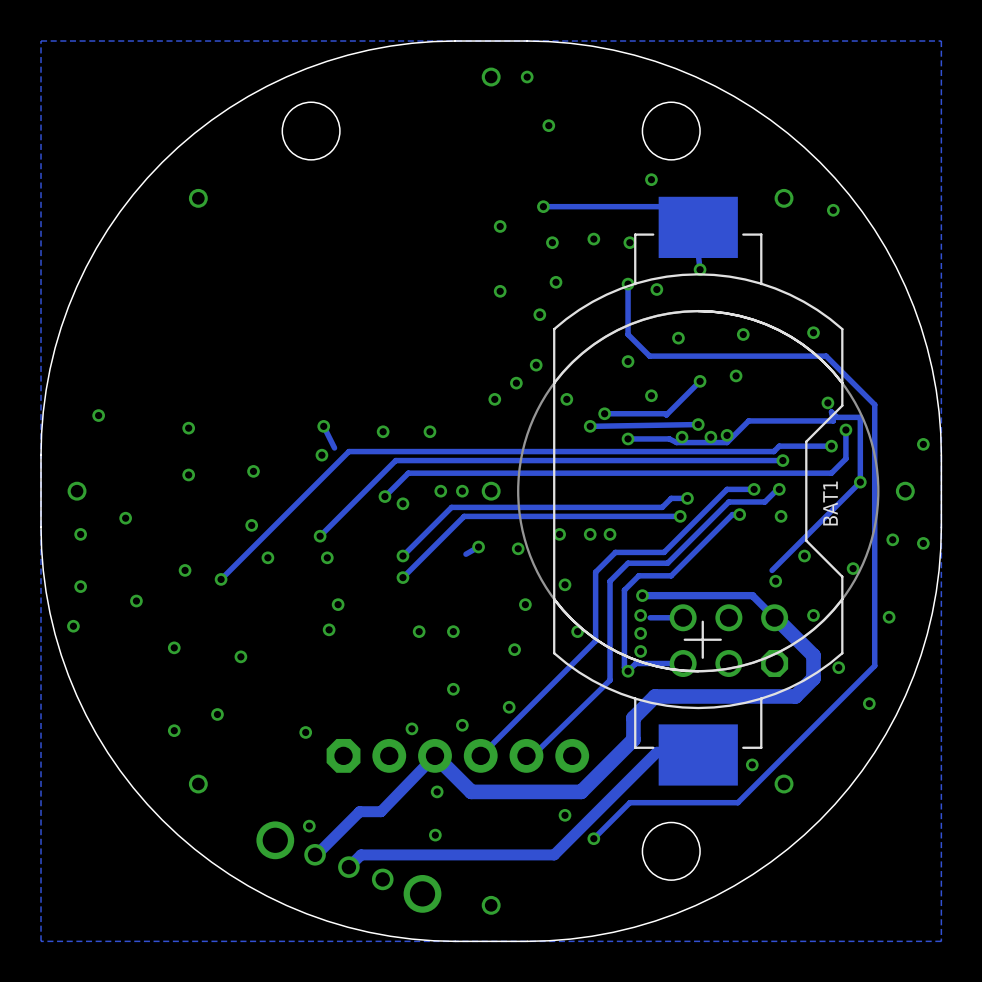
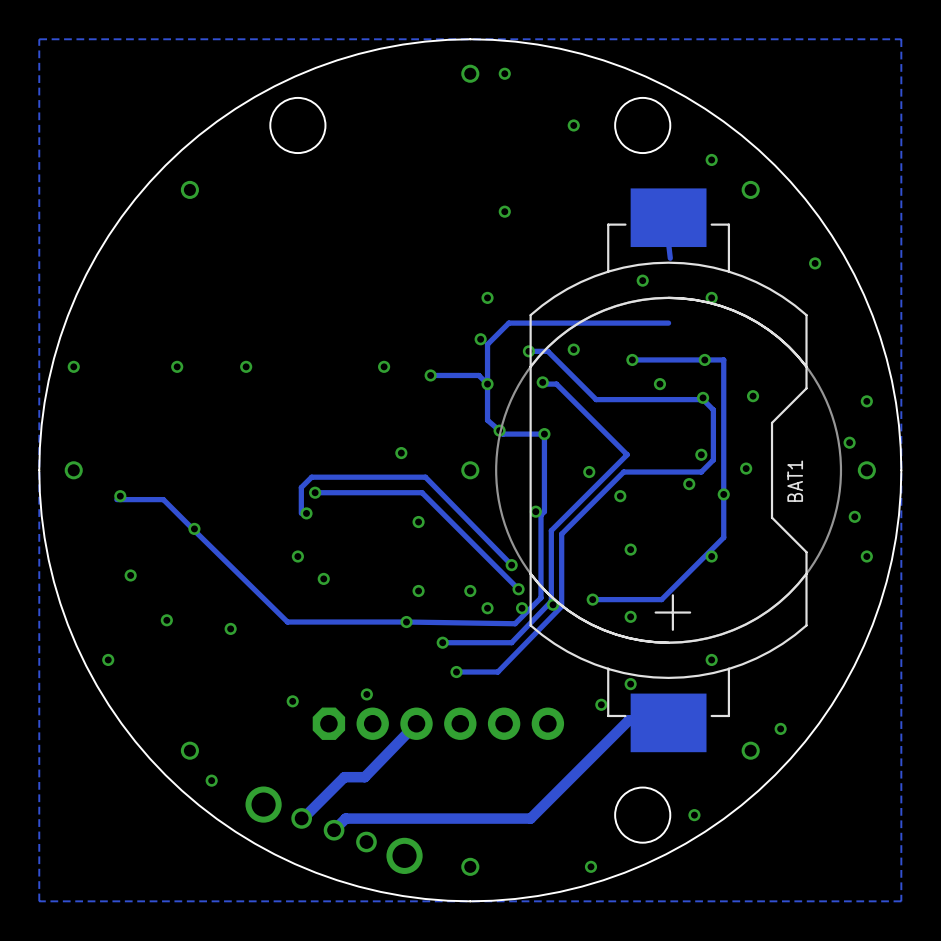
board edge: (527, 41) (411, 43) (347, 55) (306, 68) (267, 86) (211, 120) (178, 147) (147, 178) (120, 211) (96, 248) (76, 286) (61, 327) (46, 390) (41, 455) (41, 548) (46, 591) (55, 634) (68, 675) (86, 715) (107, 752) (133, 787) (162, 820) (194, 849) (229, 874) (267, 896) (306, 913) (347, 927) (390, 936) (455, 941) (548, 940) (591, 936) (634, 927) (675, 913) (715, 896) (752, 874) (787, 849) (820, 820) (849, 787) (874, 752) (896, 715) (913, 675) (927, 634) (936, 591) (940, 548) (941, 455) (939, 411) (932, 369) (921, 327) (905, 286) (885, 248) (862, 211) (820, 162) (787, 133) (752, 107) (715, 86) (655, 61) (613, 50) (570, 43) (527, 41) -> (470, 39) (515, 41) (559, 48) (624, 67) (665, 86) (705, 108) (741, 135) (775, 165) (805, 199) (831, 235) (854, 274) (872, 315) (891, 380) (898, 425) (901, 470) (898, 515) (891, 559) (872, 624) (854, 665) (831, 705) (805, 741) (775, 775) (741, 805) (705, 831) (665, 854) (624, 872) (559, 891) (515, 898) (470, 901) (425, 898) (380, 891) (315, 872) (274, 854) (235, 831) (199, 805) (165, 775) (135, 741) (108, 705) (86, 665) (67, 624) (48, 559) (41, 515) (39, 470) (41, 425) (48, 380) (67, 315) (86, 274) (108, 235) (135, 199) (165, 165) (199, 135) (235, 108) (274, 86) (315, 67) (380, 48) (425, 41) (470, 39)
via: (548, 125) -> none
via: none -> (573, 125)
via: none -> (711, 159)
via: (651, 179) -> none
track: (543, 206) (697, 208) -> none
via: (543, 206) -> none
via: (833, 210) -> none
via: none -> (504, 211)
via: (500, 226) -> none
via: (593, 239) -> none
via: (552, 242) -> none
via: (629, 242) -> none
via: (700, 269) -> none
via: none -> (815, 263)
via: (556, 282) -> none
track: (628, 284) (628, 334) (649, 356) (826, 356) (874, 404) (874, 665) (737, 802) (629, 802) (593, 838) -> none
via: (628, 284) -> none
via position: (656, 289) -> (642, 280)
via: (500, 291) -> none
via: none -> (487, 297)
via: (539, 314) -> none
via: (813, 332) -> none
via position: (743, 334) -> (711, 297)
track: none -> (668, 323) (508, 323) (487, 344) (487, 420) (503, 434) (544, 434) (544, 511) (540, 515) (540, 597) (515, 623) (287, 622) (194, 530)
via: (678, 338) -> none
via: none -> (480, 339)
via: (628, 361) -> none
via position: (536, 365) -> (528, 351)
via: none -> (573, 349)
track: none -> (528, 351) (547, 351) (596, 399) (703, 399)
track: none -> (632, 359) (723, 359) (723, 537) (661, 599) (592, 599)
via: none -> (632, 359)
track: (700, 381) (666, 414) (604, 413) -> none
via: (700, 381) -> none
via: none -> (177, 366)
via: none -> (246, 366)
via: none -> (384, 366)
via: (516, 383) -> none
track: none -> (430, 375) (478, 375) (487, 384)
via: none -> (430, 375)
via: (651, 395) -> none
via: (494, 399) -> none
via: none -> (487, 384)
track: none -> (546, 384) (556, 384) (627, 454) (551, 530) (551, 601) (511, 642) (442, 642)
via: none -> (659, 384)
via: (827, 402) -> none
via: (604, 413) -> none
via: none -> (753, 396)
via position: (98, 415) -> (73, 366)
via: none -> (703, 397)
track: none -> (703, 399) (713, 409) (713, 459) (701, 472) (623, 472) (561, 534) (561, 606) (497, 672) (456, 672)
via: none -> (866, 401)
track: (698, 424) (590, 426) -> none
via: (698, 424) -> none
track: (323, 426) (334, 447) -> none
via: (323, 426) -> none
via: (590, 426) -> none
via: (188, 428) -> none
track: (845, 429) (845, 458) (831, 473) (408, 473) (384, 496) -> none
via: (845, 429) -> none
via: (383, 431) -> none
via: (429, 431) -> none
via: (727, 435) -> none
via: (682, 437) -> none
via: (710, 437) -> none
track: (628, 438) (669, 438) (676, 442) (727, 442) (748, 420) (833, 420) (831, 411) (836, 417) (860, 417) (860, 482) (772, 570) -> none
via: (628, 438) -> none
via: (923, 444) -> none
track: (831, 446) (779, 446) (773, 451) (348, 451) (221, 579) -> none
via: (831, 446) -> none
via: none -> (499, 430)
via: none -> (544, 434)
via: (321, 455) -> none
track: (782, 460) (395, 460) (320, 536) -> none
via: (782, 460) -> none
via: none -> (849, 442)
via: (253, 471) -> none
via: none -> (401, 453)
via: (188, 474) -> none
via: none -> (701, 454)
via: (860, 482) -> none
track: (754, 489) (727, 489) (664, 552) (615, 552) (595, 572) (595, 641) (480, 755) -> none
via: (754, 489) -> none
track: (779, 489) (779, 487) (764, 501) (728, 501) (667, 563) (628, 563) (610, 581) (610, 680) (533, 755) (526, 755) -> none
via: (440, 491) -> none
via: (462, 491) -> none
via: none -> (589, 472)
via: (384, 496) -> none
track: (687, 498) (671, 498) (662, 507) (451, 507) (402, 556) -> none
via: (687, 498) -> none
via: (402, 503) -> none
via: none -> (689, 484)
track: none -> (315, 492) (422, 492) (518, 589)
via: none -> (315, 492)
track: (739, 514) (732, 514) (671, 575) (638, 575) (624, 590) (624, 667) (628, 671) (635, 663) (683, 663) -> none
via: (739, 514) -> none
track: (680, 516) (464, 516) (402, 577) -> none
via: (680, 516) -> none
via: none -> (723, 494)
via: (781, 516) -> none
via: none -> (620, 496)
track: none -> (116, 499) (163, 499) (194, 530)
via: (251, 525) -> none
via: (80, 534) -> none
via: (590, 534) -> none
via: (610, 534) -> none
track: none -> (301, 513) (301, 487) (311, 477) (425, 477) (511, 565)
via: (923, 543) -> none
via: none -> (418, 522)
track: (478, 547) (465, 554) -> none
via: (478, 547) -> none
via: (518, 548) -> none
via: none -> (194, 528)
via: (402, 556) -> none
via: (804, 556) -> none
via: (267, 557) -> none
via: (327, 557) -> none
via: (853, 568) -> none
via: (185, 570) -> none
via: none -> (630, 549)
via: (402, 577) -> none
via: (221, 579) -> none
via: none -> (297, 556)
via position: (775, 581) -> (711, 556)
via: none -> (866, 556)
via: (565, 584) -> none
via: (80, 586) -> none
via: none -> (511, 565)
track: (642, 595) (752, 595) (813, 655) (813, 678) (795, 696) (655, 696) (633, 718) (633, 739) (581, 791) (471, 791) (435, 755) -> none
via: (642, 595) -> none
via: (525, 604) -> none
via: none -> (518, 589)
via: (640, 615) -> none
via: (813, 615) -> none
via: none -> (418, 590)
via: none -> (470, 590)
track: (683, 617) (650, 617) -> none
via: (889, 617) -> none
via: (73, 626) -> none
via: none -> (592, 599)
via: (329, 629) -> none
via: (419, 631) -> none
via: (453, 631) -> none
via: (640, 633) -> none
via: none -> (522, 608)
part: (728, 640) -> none
via: none -> (630, 616)
via: none -> (406, 622)
via position: (514, 649) -> (487, 608)
via: (640, 651) -> none
via: (838, 667) -> none
via: none -> (442, 642)
via: (628, 671) -> none
via: none -> (108, 659)
via: (453, 689) -> none
via: none -> (711, 659)
via: none -> (456, 672)
via: (869, 703) -> none
via: (509, 707) -> none
via: (217, 714) -> none
via: none -> (630, 684)
via: (462, 725) -> none
via position: (411, 728) -> (366, 694)
via: (174, 730) -> none
via: none -> (601, 704)
via: none -> (780, 728)
via: (752, 764) -> none
via: (437, 791) -> none
via: none -> (211, 780)
via: (565, 815) -> none
via: (309, 826) -> none
via: (435, 835) -> none
via: (593, 838) -> none
via: none -> (694, 815)
via: none -> (590, 866)

